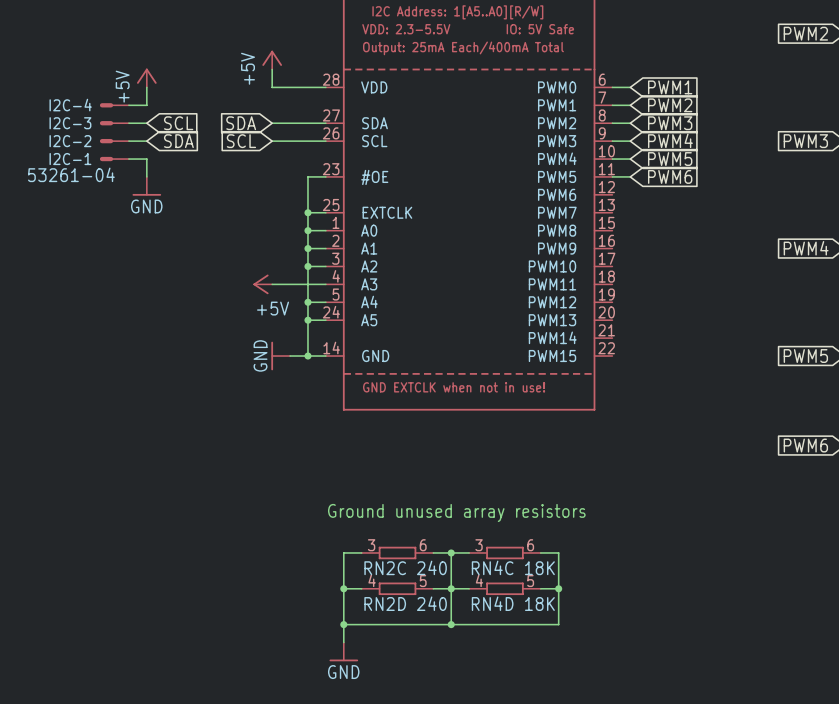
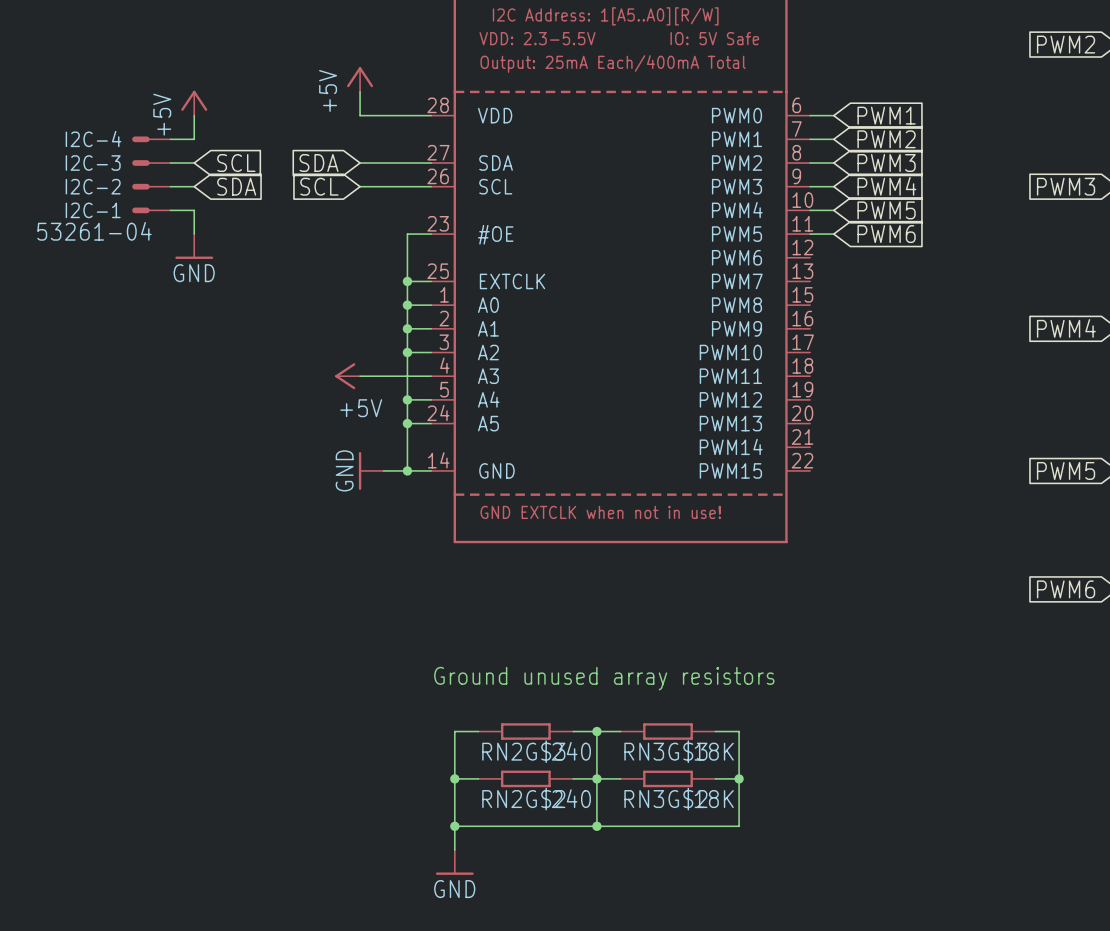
RN2C pin number: 3 (371, 545) -> none
RN2C pin number: 6 (423, 545) -> none
RN4C pin number: 3 (479, 545) -> none
RN4C pin number: 6 (530, 545) -> none
RN4C name: RN4C (492, 567) -> RN3G$3 (665, 751)
RN2C name: RN2C (385, 568) -> RN2G$3 (523, 751)
RN2D pin number: 4 (372, 580) -> none
RN4D pin number: 4 (479, 580) -> none
RN2D pin number: 5 (423, 581) -> none
RN4D pin number: 5 (530, 581) -> none
RN4D name: RN4D (492, 603) -> RN3G$2 (665, 799)
RN2D name: RN2D (385, 604) -> RN2G$2 (523, 799)

